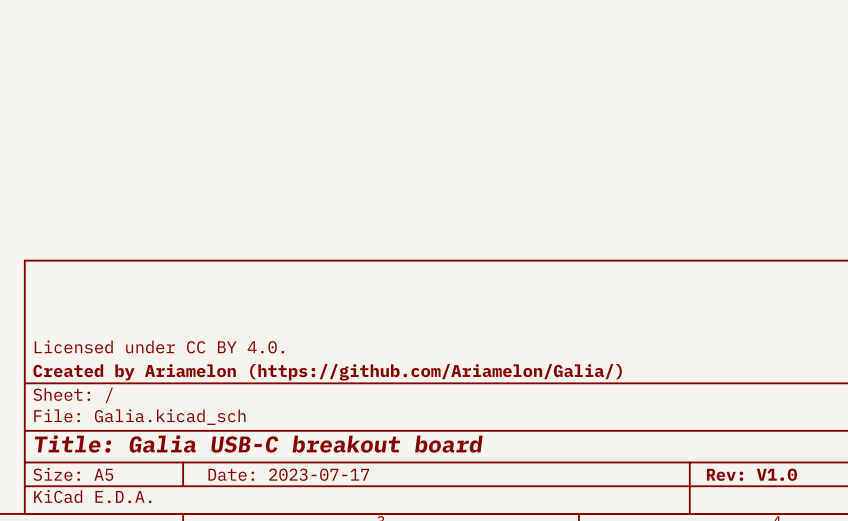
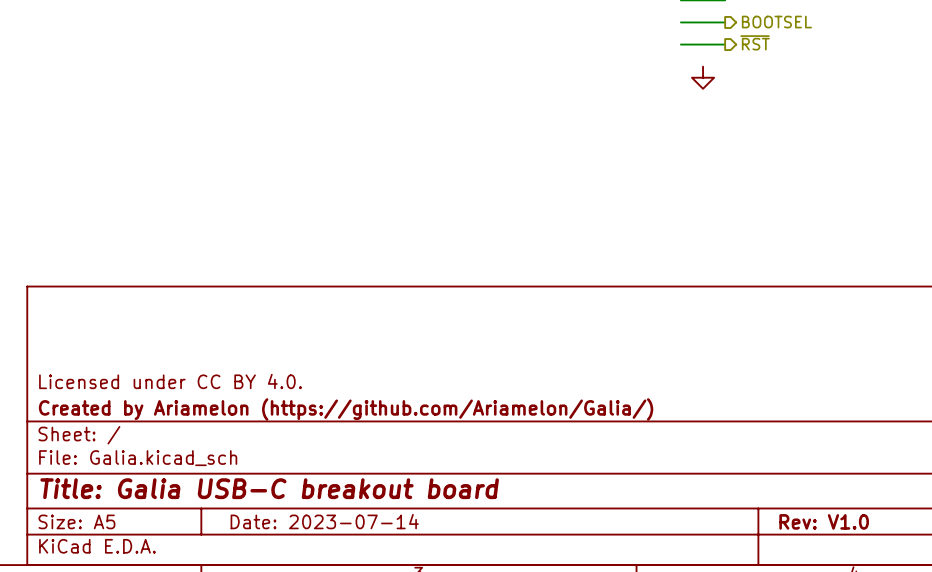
wire: none -> (680, 0) (725, 0)
wire: none -> (680, 22) (725, 22)
hierarchical label: none -> BOOTSEL (776, 22)
hierarchical label: none -> ~{RST} (755, 42)
wire: none -> (680, 44) (725, 44)
power symbol: none -> (703, 77)
title block: Date: 2023-07-17 (288, 474) -> Date: 2023-07-14 (324, 521)

